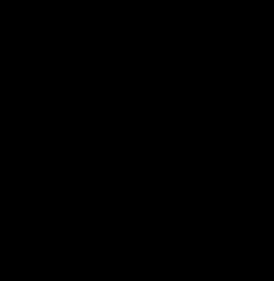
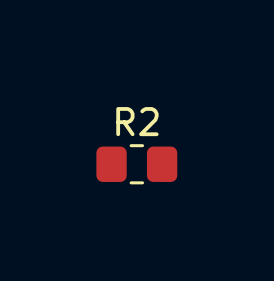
R2: none -> (136, 164)

